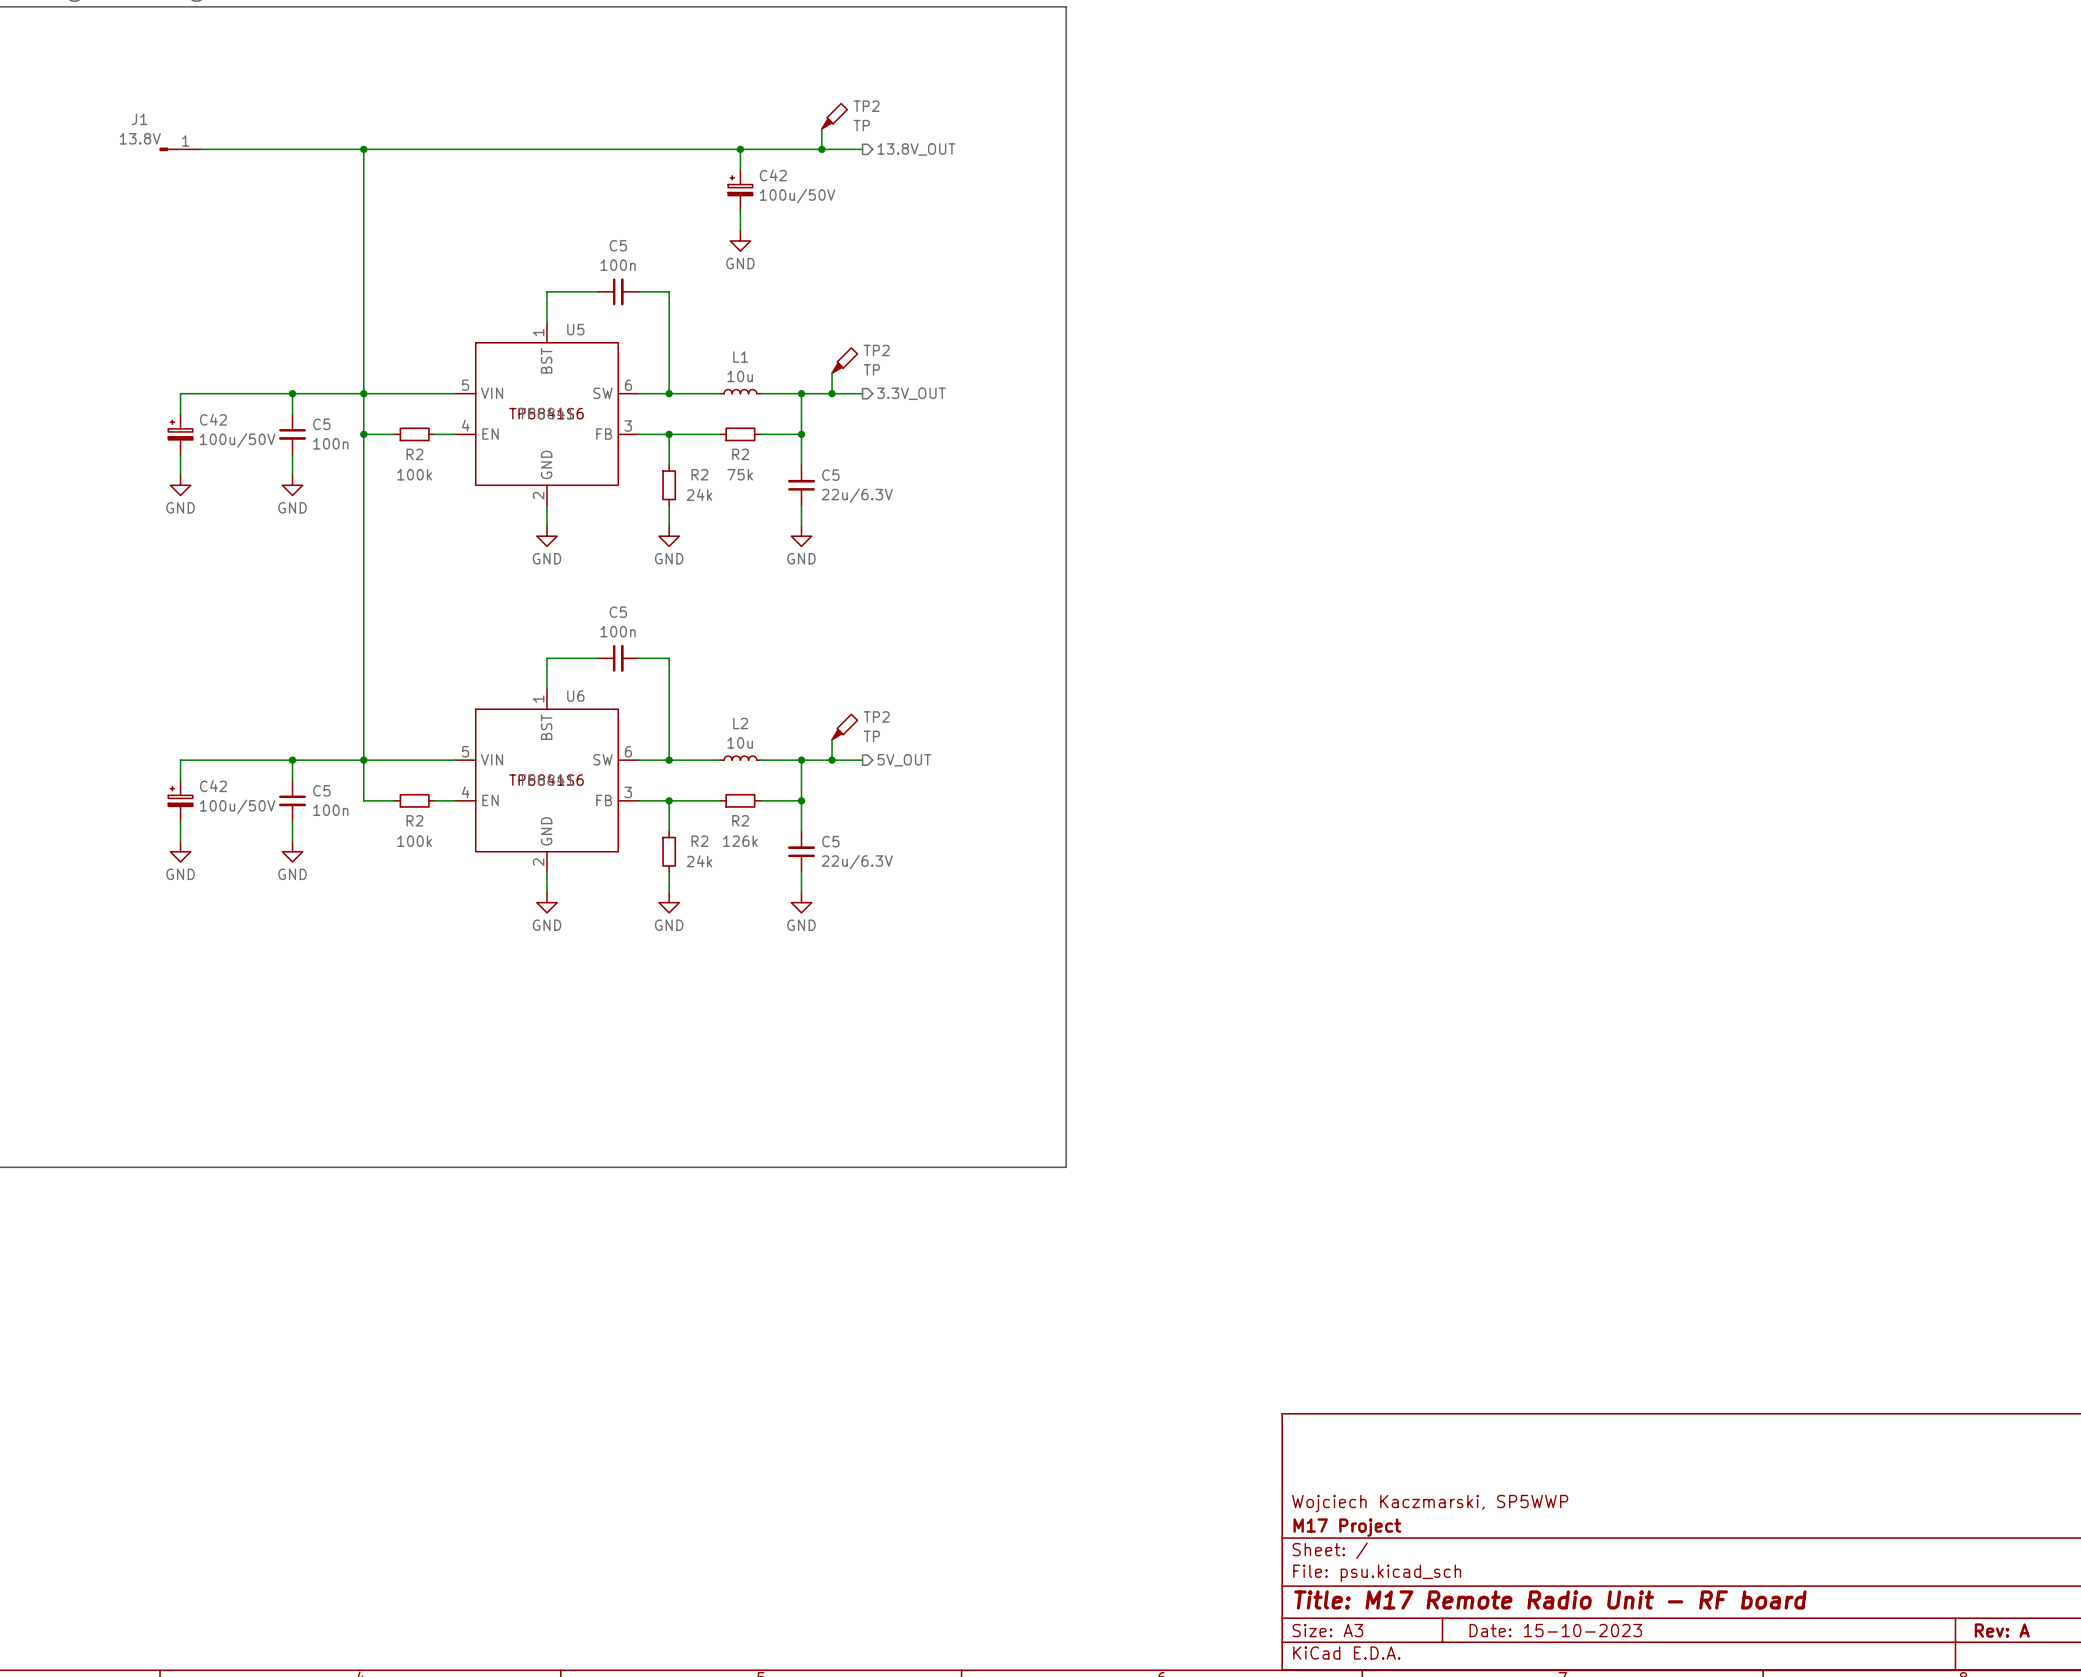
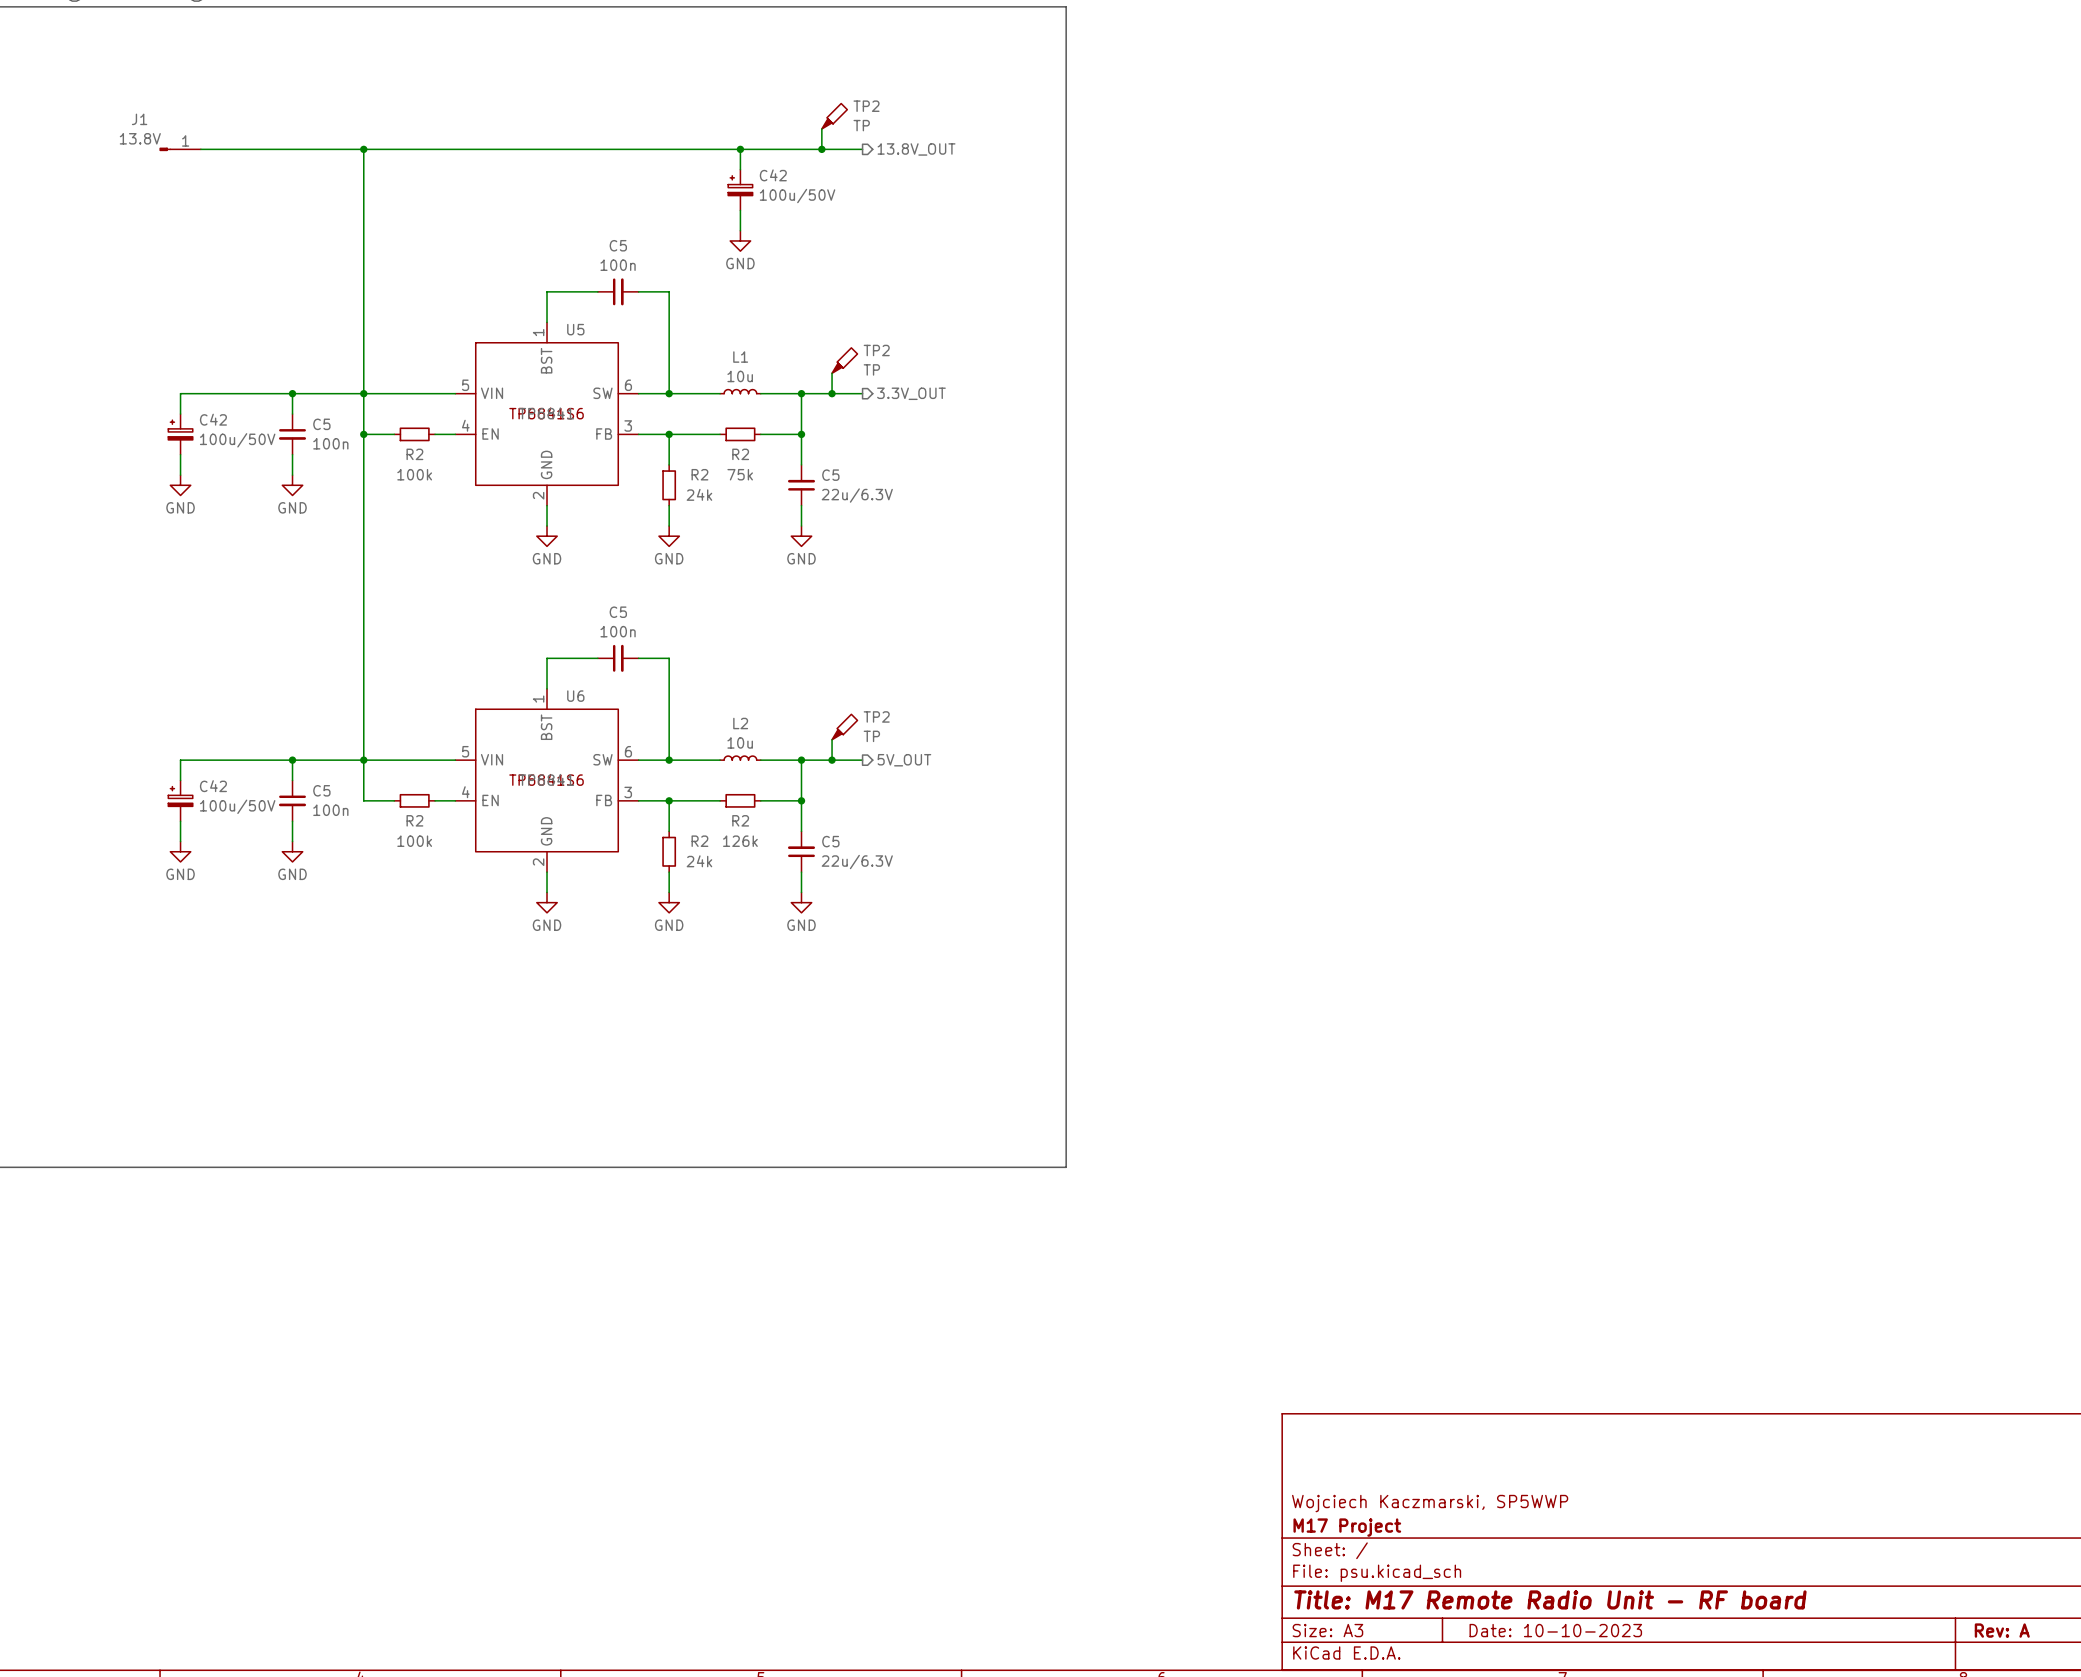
title block: Date: 15-10-2023 (1555, 1630) -> Date: 10-10-2023 (1555, 1630)

